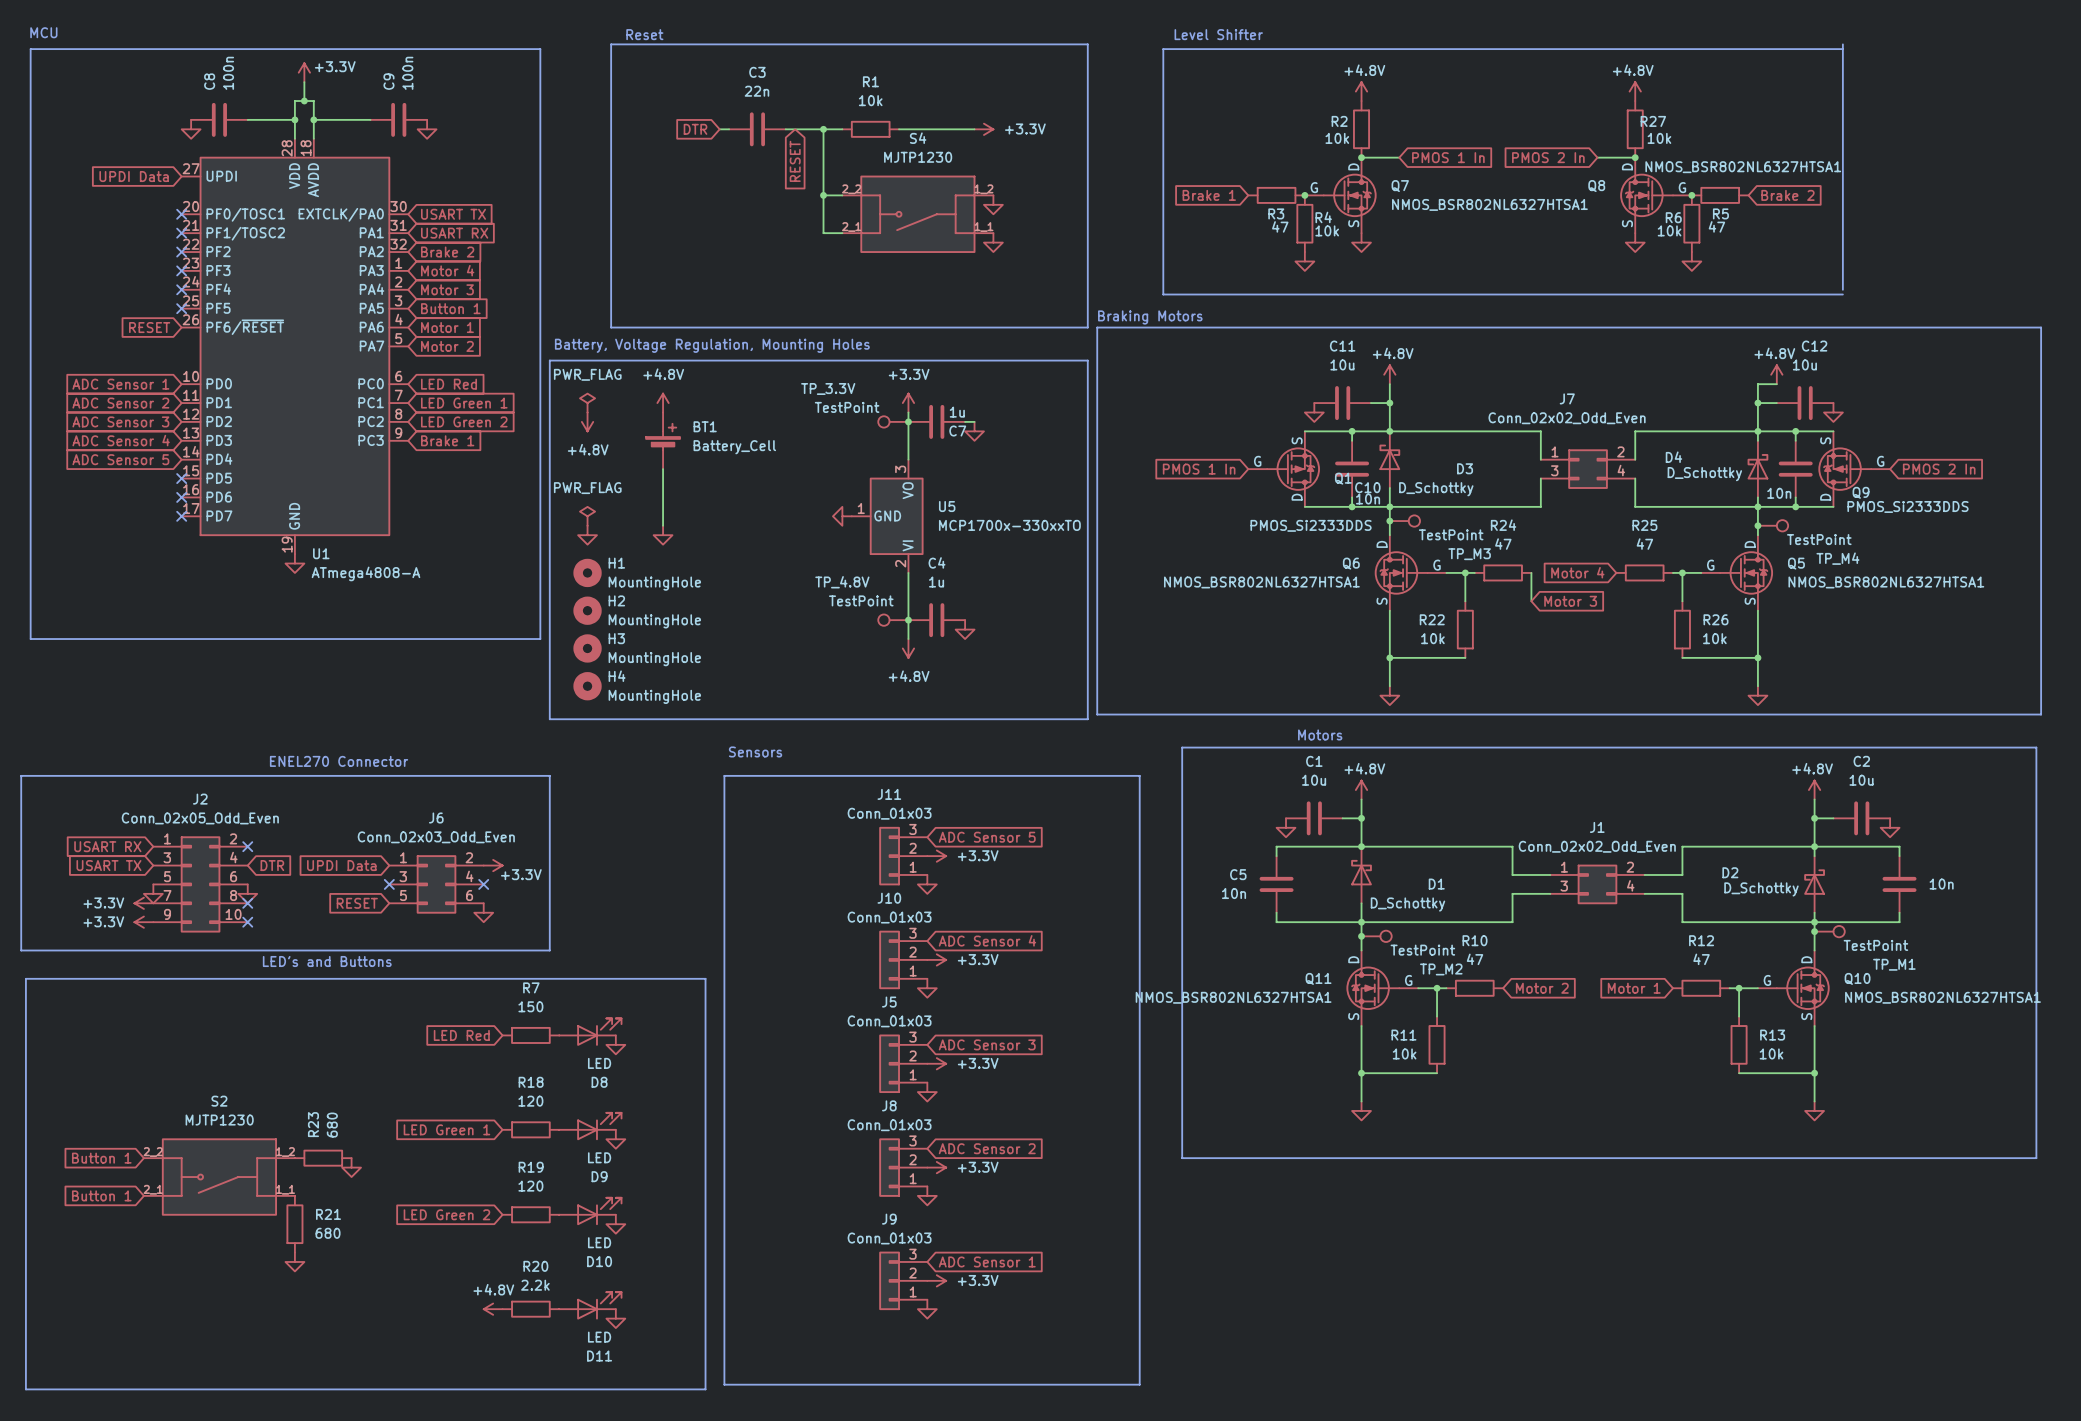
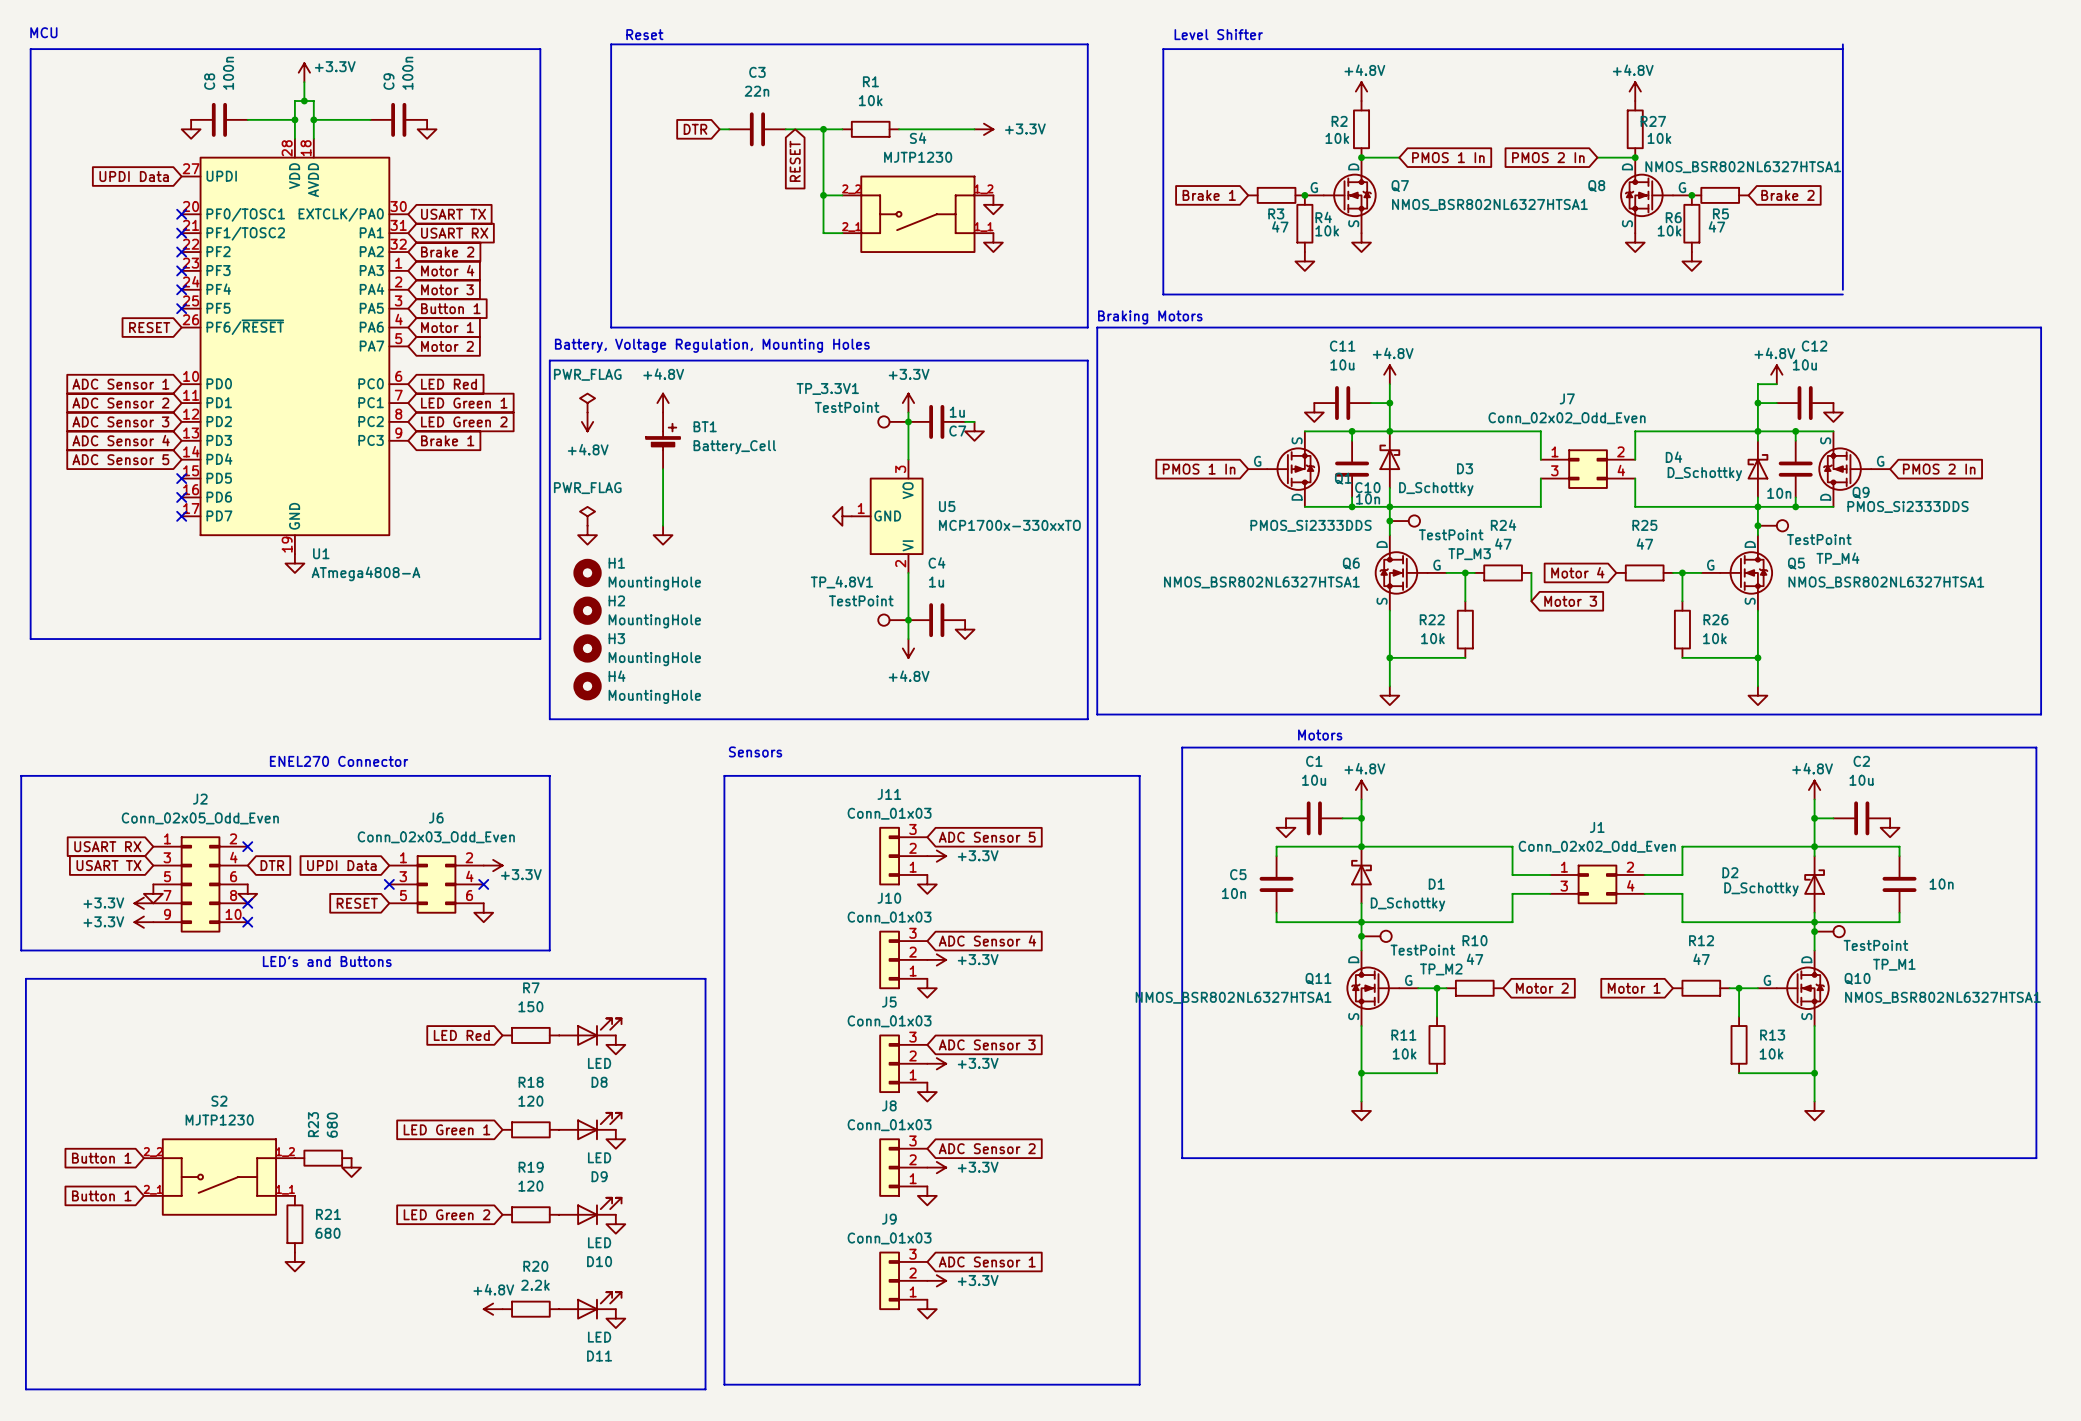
TP_3.3V name: TP_3.3V (828, 388) -> TP_3.3V1 (827, 388)
TP_4.8V name: TP_4.8V (842, 582) -> TP_4.8V1 (841, 582)

